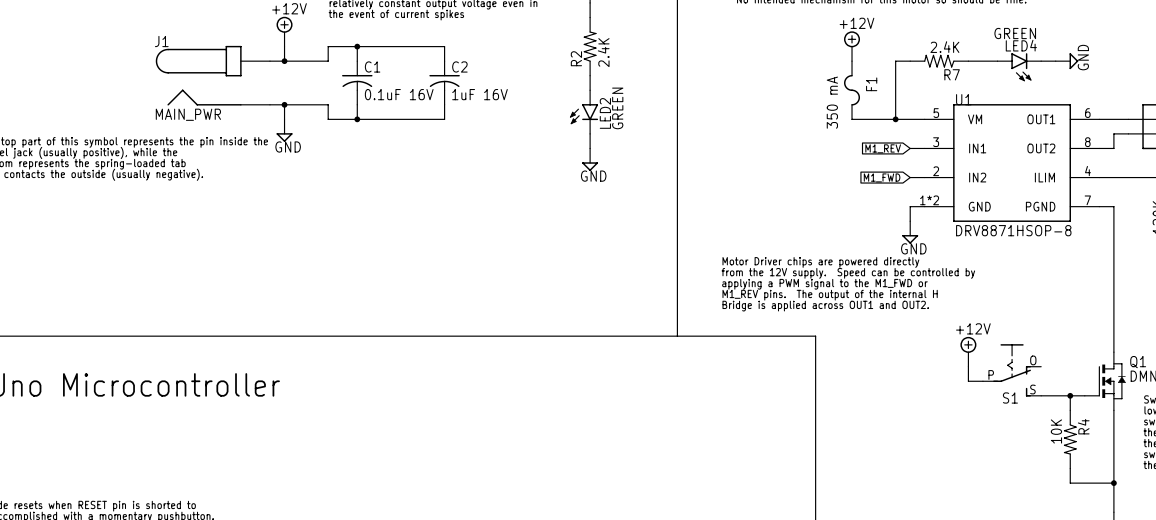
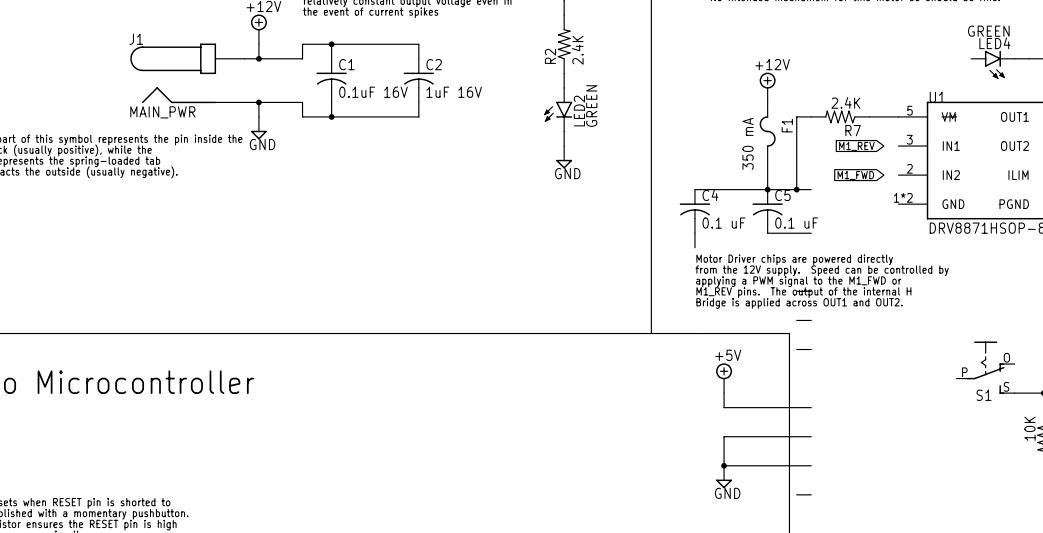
power symbol position: +12V (852, 46) -> +12V (767, 87)
wire: (852, 61) (852, 75) -> (767, 102) (767, 116)
wire: (910, 61) (895, 61) (895, 119) (852, 119) (852, 104) -> none
R7 position: (939, 61) -> (840, 116)
wire: (968, 61) (997, 61) -> none
F1 position: (852, 90) -> (767, 131)
wire: none -> (811, 116) (796, 116) (796, 189)
junction: (895, 119) -> none
wire: none -> (767, 146) (767, 189)
wire: (910, 148) (924, 148) -> (942, 116) (956, 116)
wire: (910, 177) (924, 177) -> none
wire: none -> (694, 189) (811, 189)
junction: none -> (767, 189)
junction: none -> (796, 189)
wire: (924, 206) (910, 206) (910, 221) -> none
C4: none -> 0.1 uF (694, 211)
C5: none -> 0.1 uF (767, 211)
power symbol: GND (910, 232) -> none
wire: none -> (694, 233) (694, 247)
wire: none -> (767, 233) (811, 233)
wire: none -> (796, 291) (811, 291)
wire: none -> (796, 320) (811, 320)
power symbol: +12V (968, 351) -> none
wire: none -> (796, 349) (811, 349)
wire: (968, 366) (968, 381) (982, 381) -> none
power symbol: none -> +5V (724, 378)
wire: none -> (724, 393) (724, 407) (811, 407)
wire: none -> (811, 436) (724, 436) (724, 465) (811, 465)
junction: none -> (724, 465)
power symbol: none -> GND (724, 477)
wire: none -> (796, 494) (811, 494)

